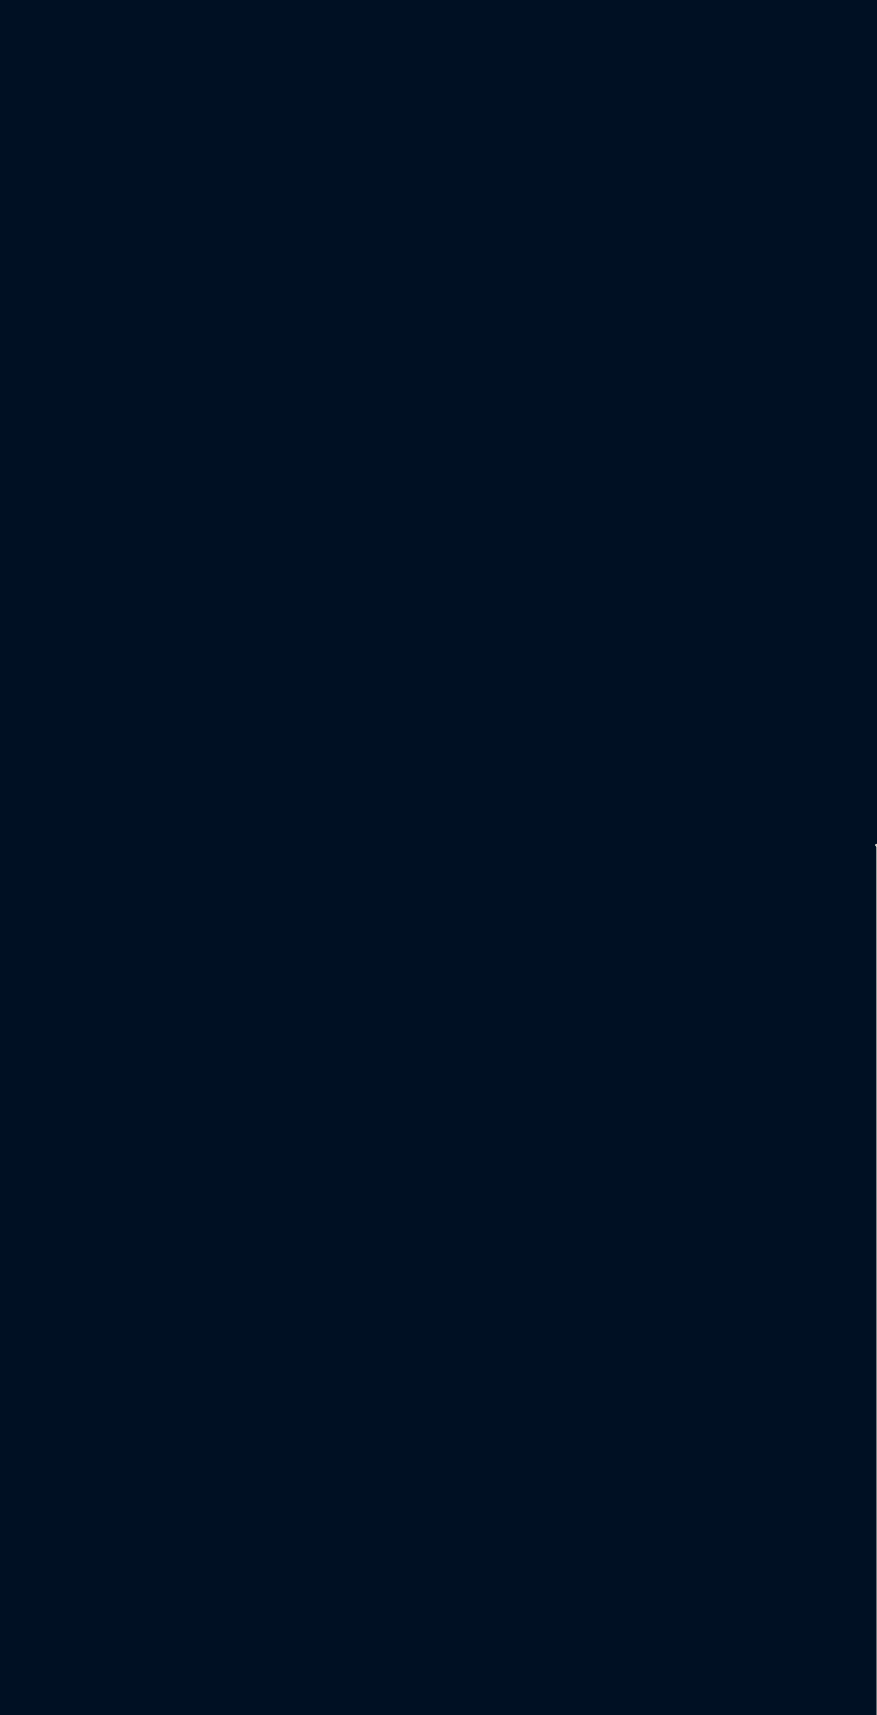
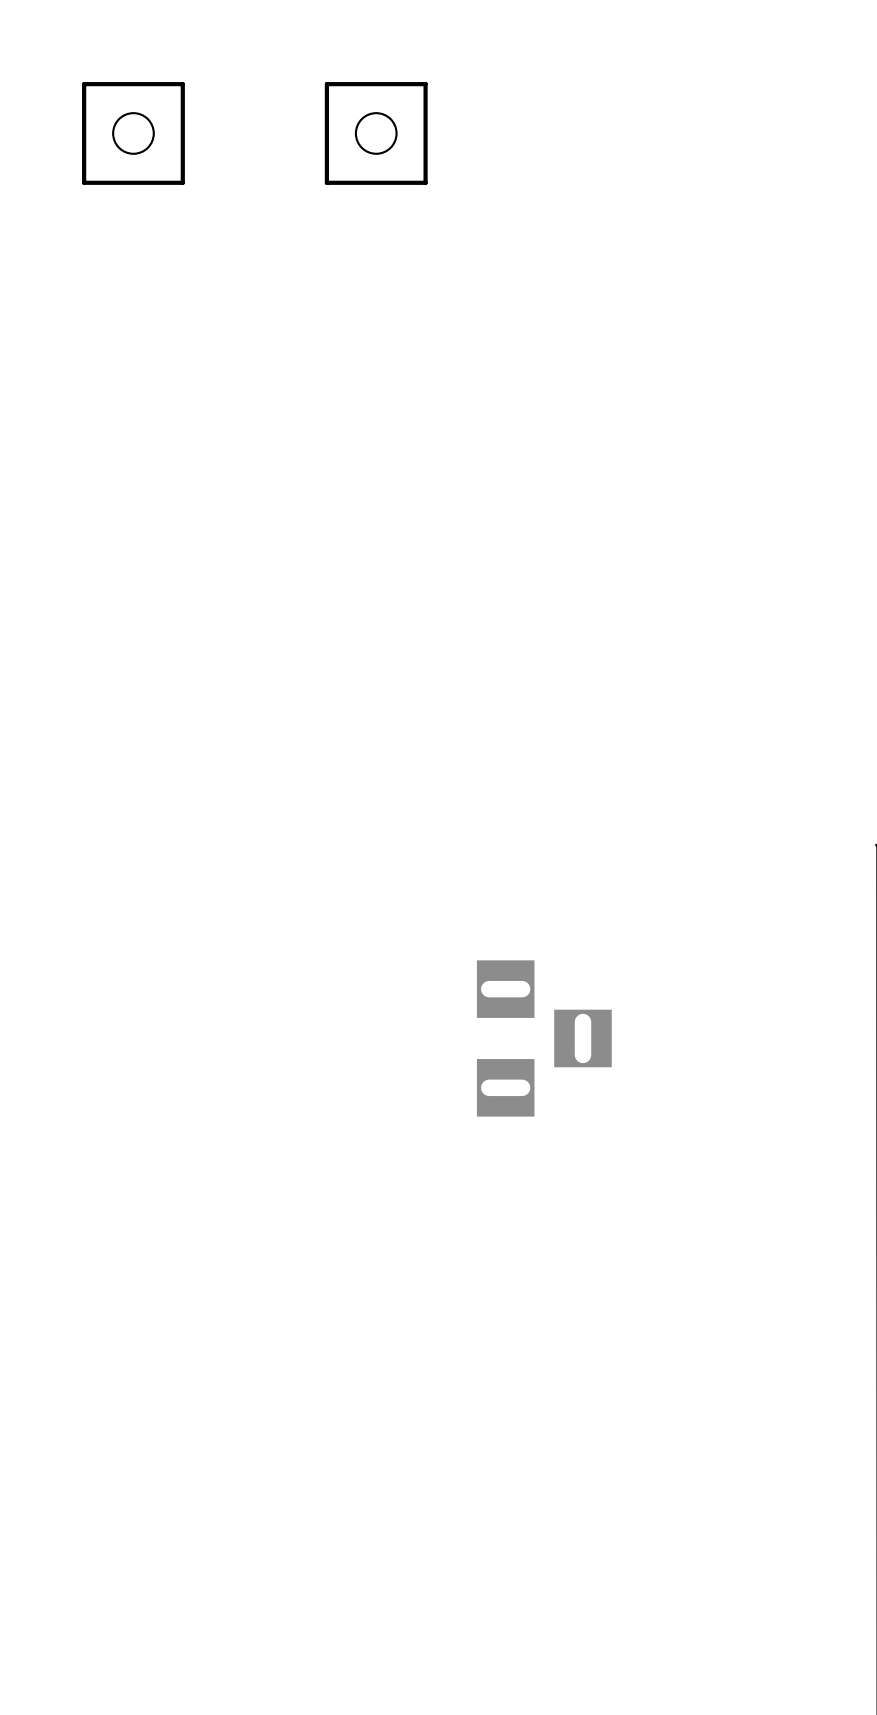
part: none -> (133, 133)
part: none -> (376, 133)
part: none -> (544, 1038)

